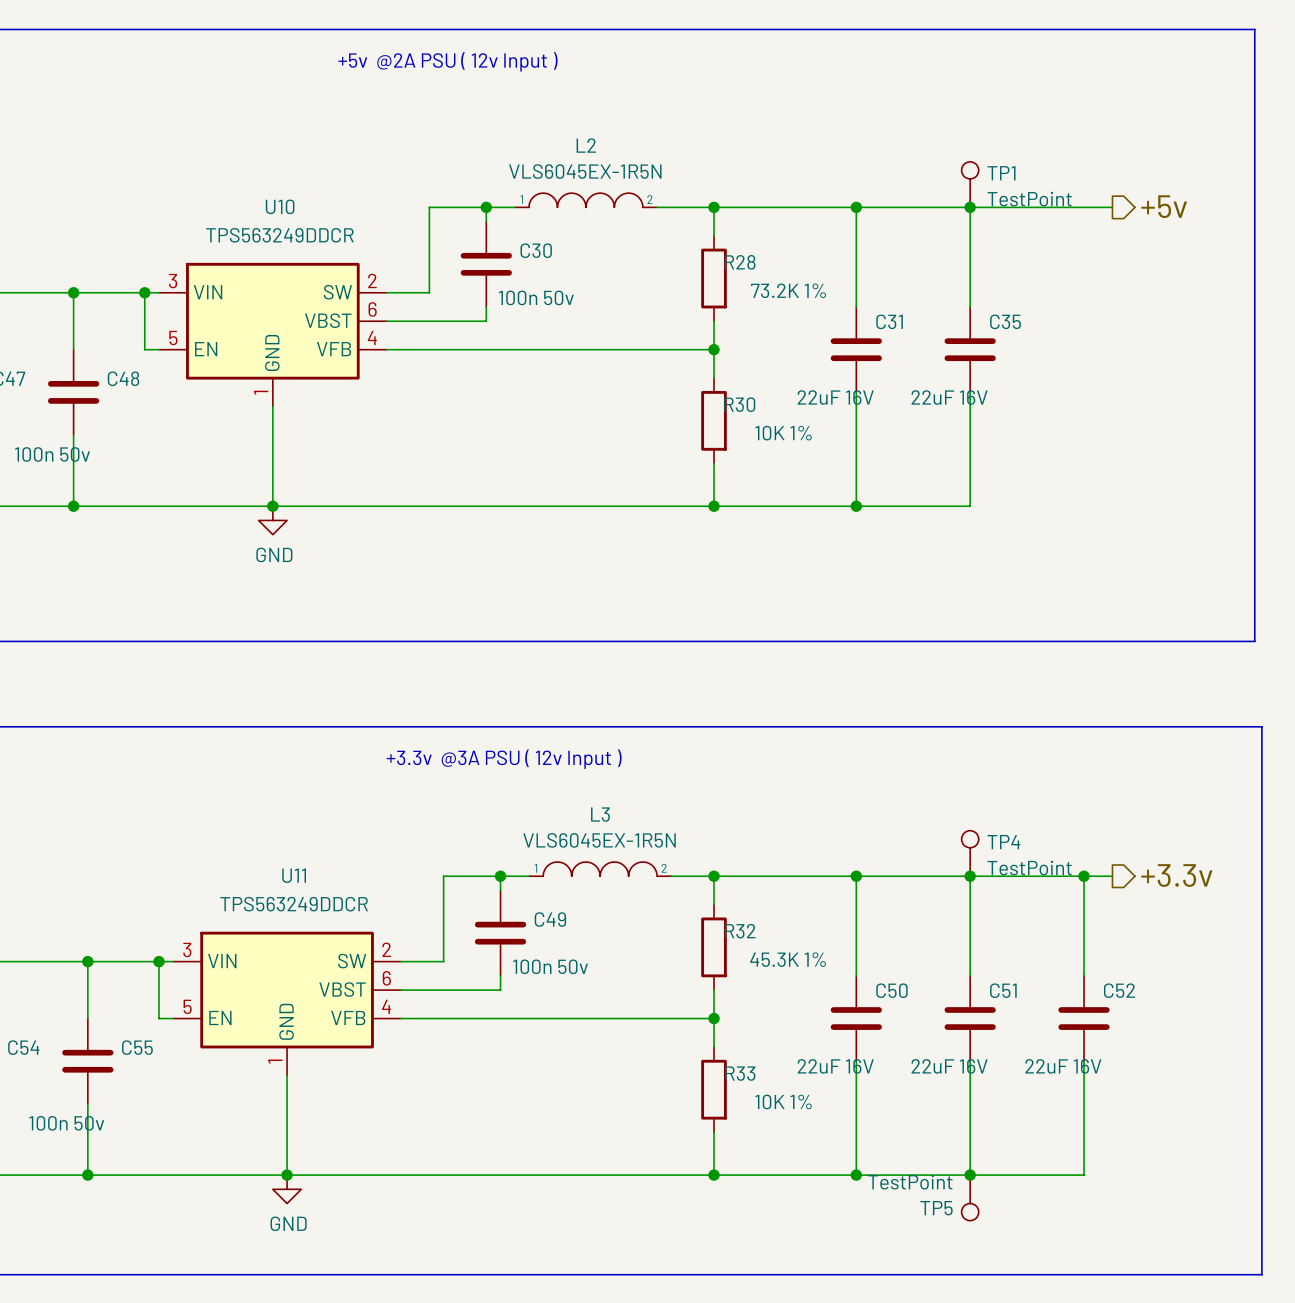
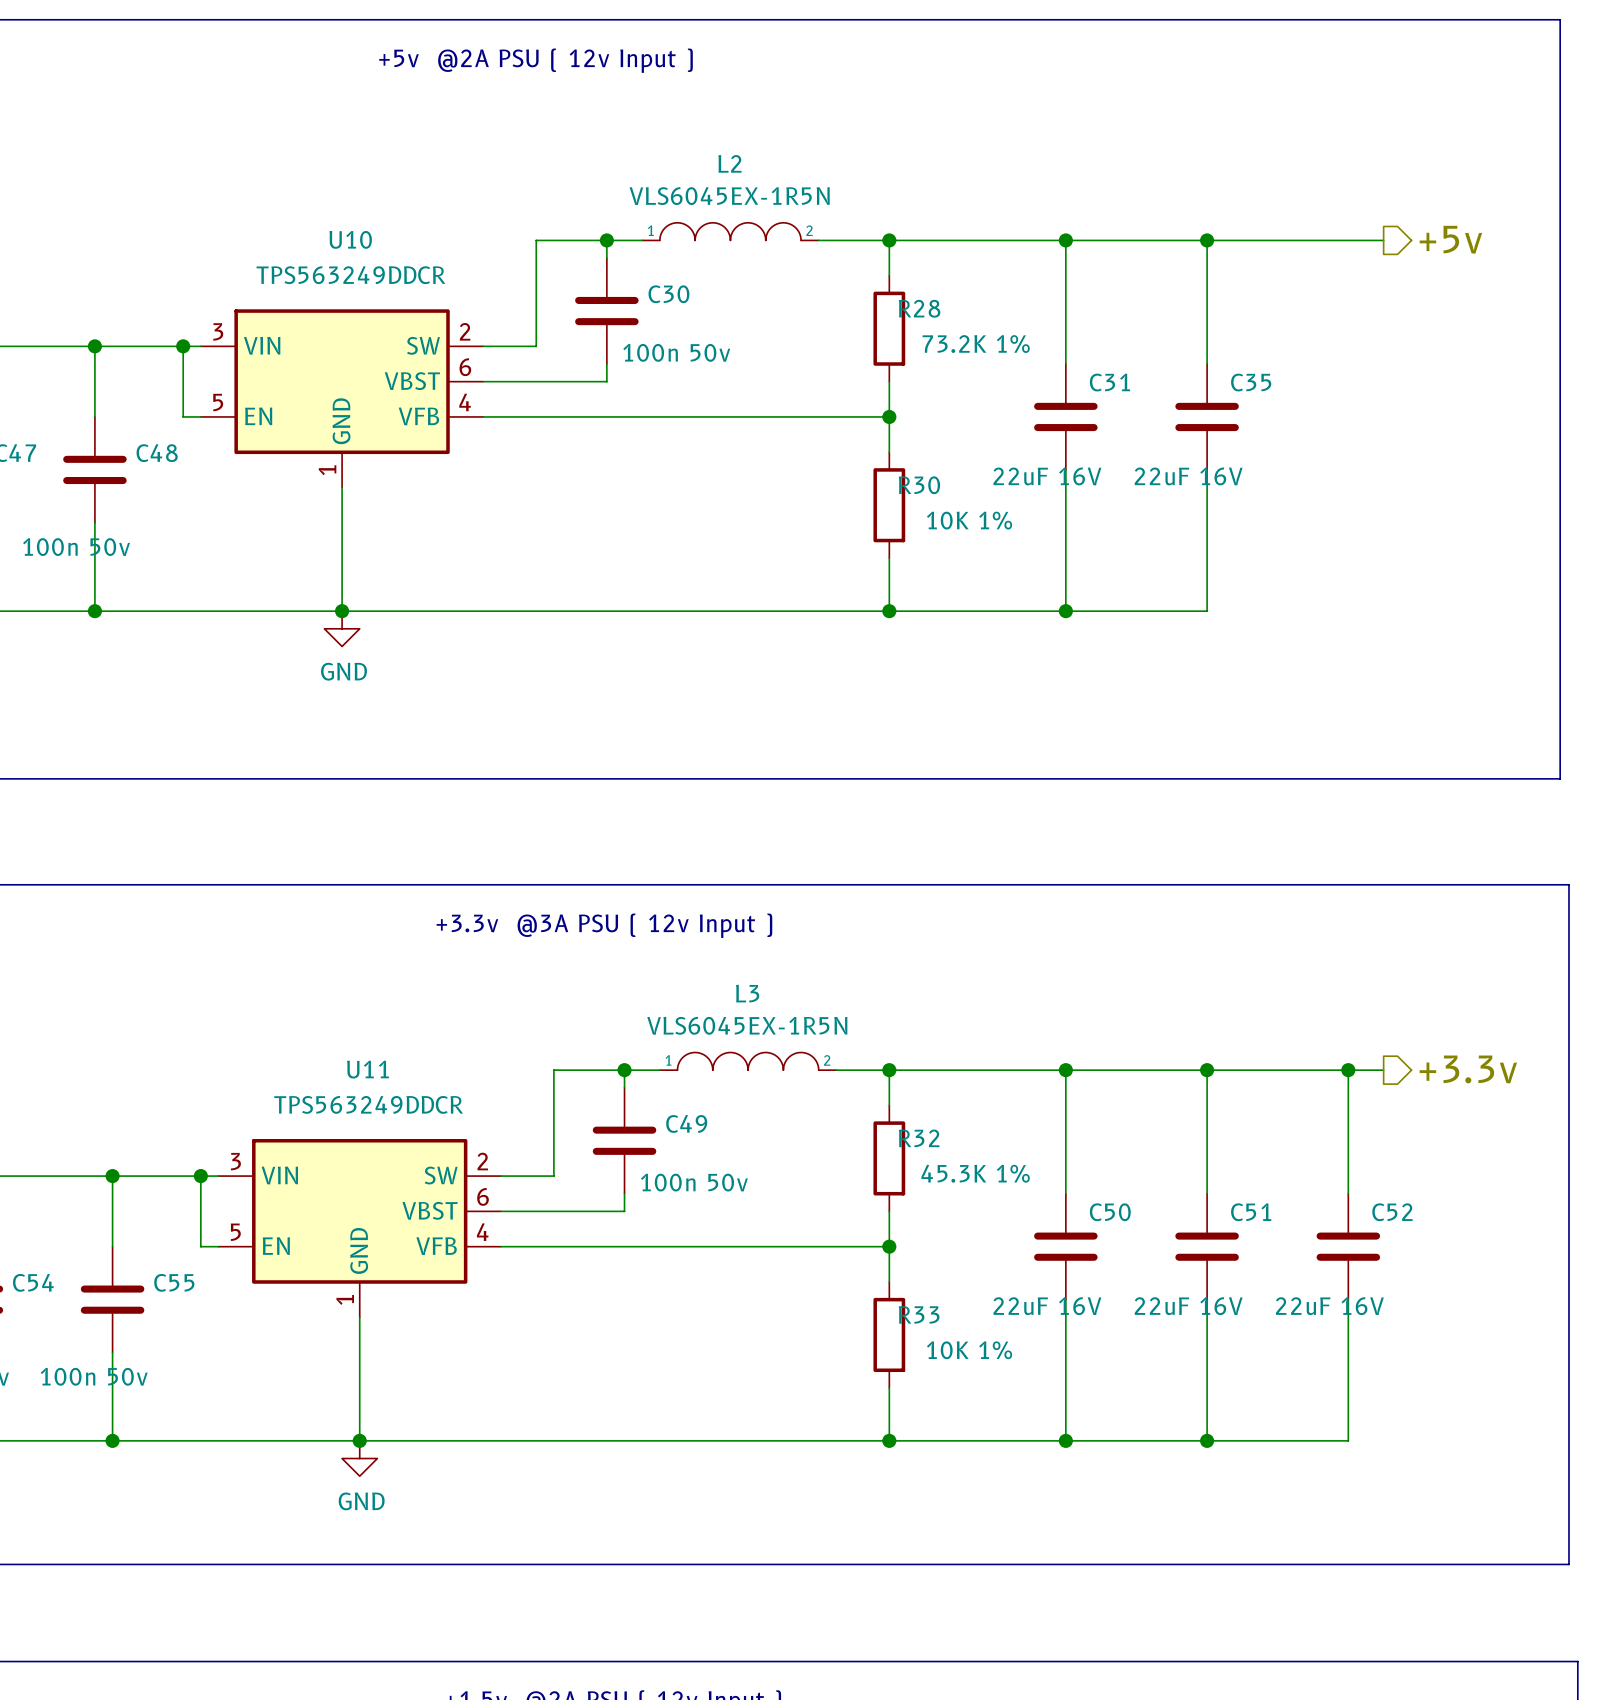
TP1: TestPoint (970, 184) -> none
TP4: TestPoint (970, 853) -> none
TP5: TestPoint (970, 1197) -> none

